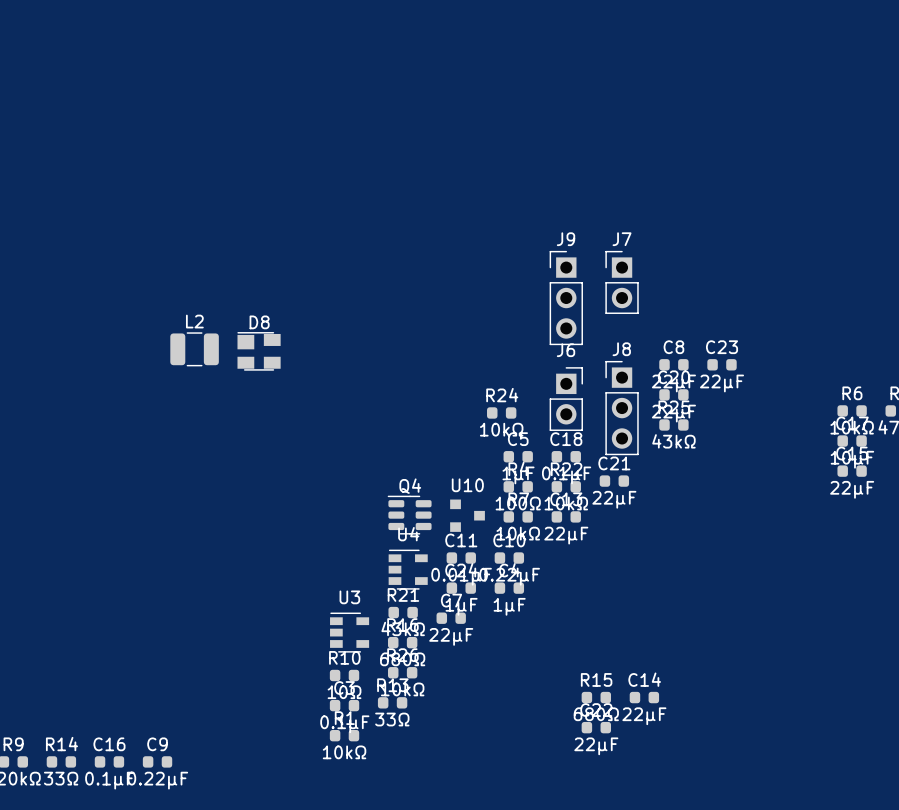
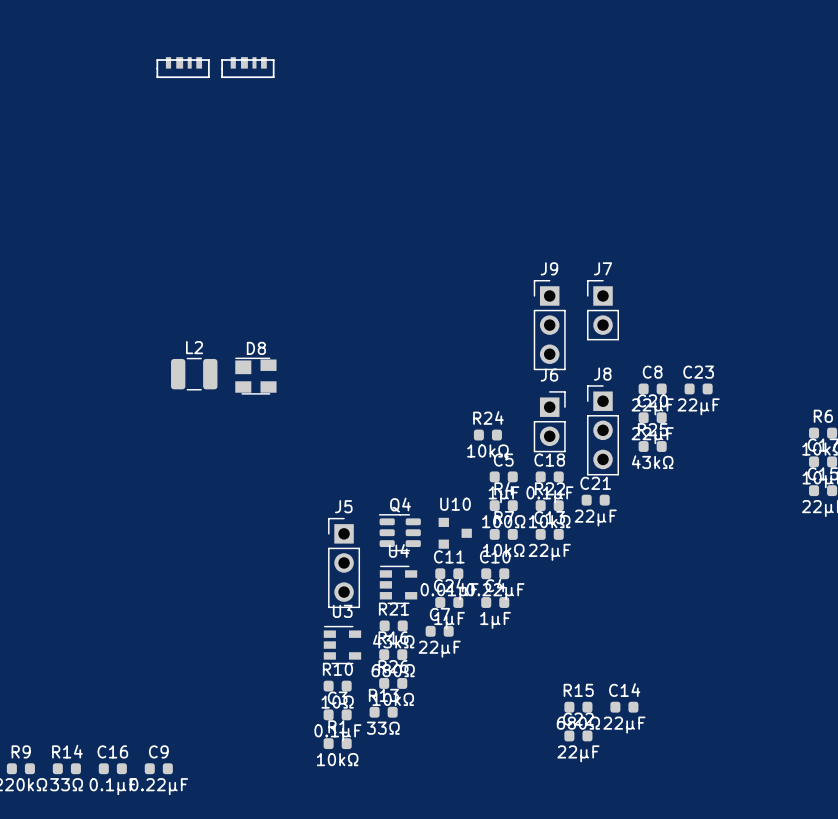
part: none -> (183, 67)
part: none -> (247, 67)
J5: none -> (344, 562)

